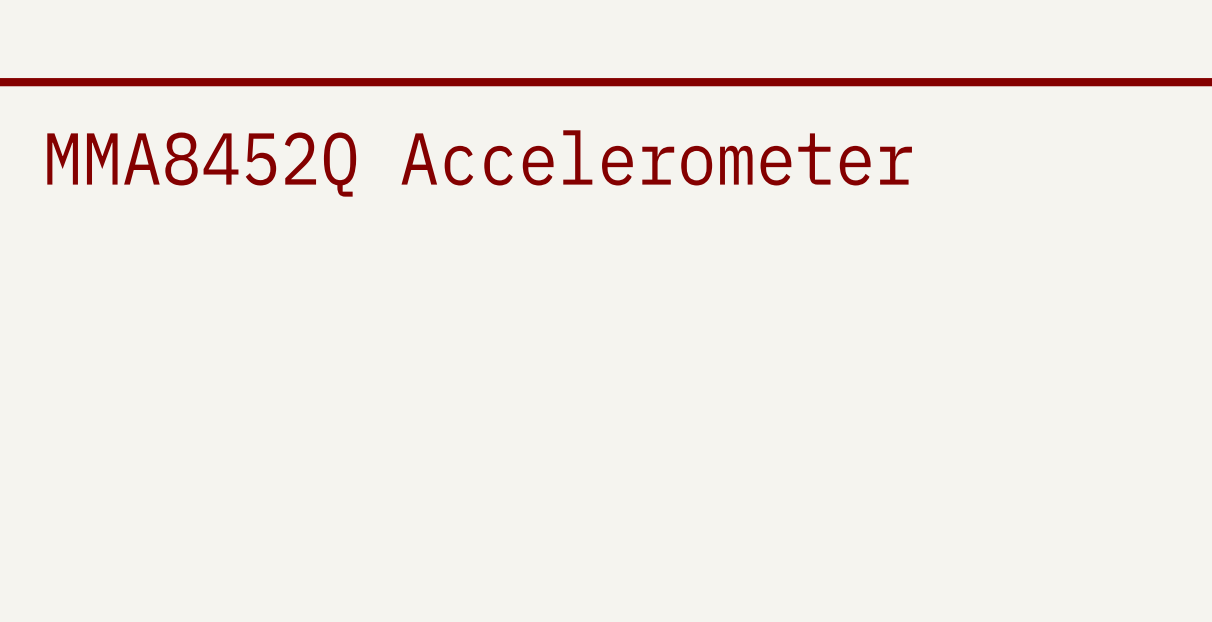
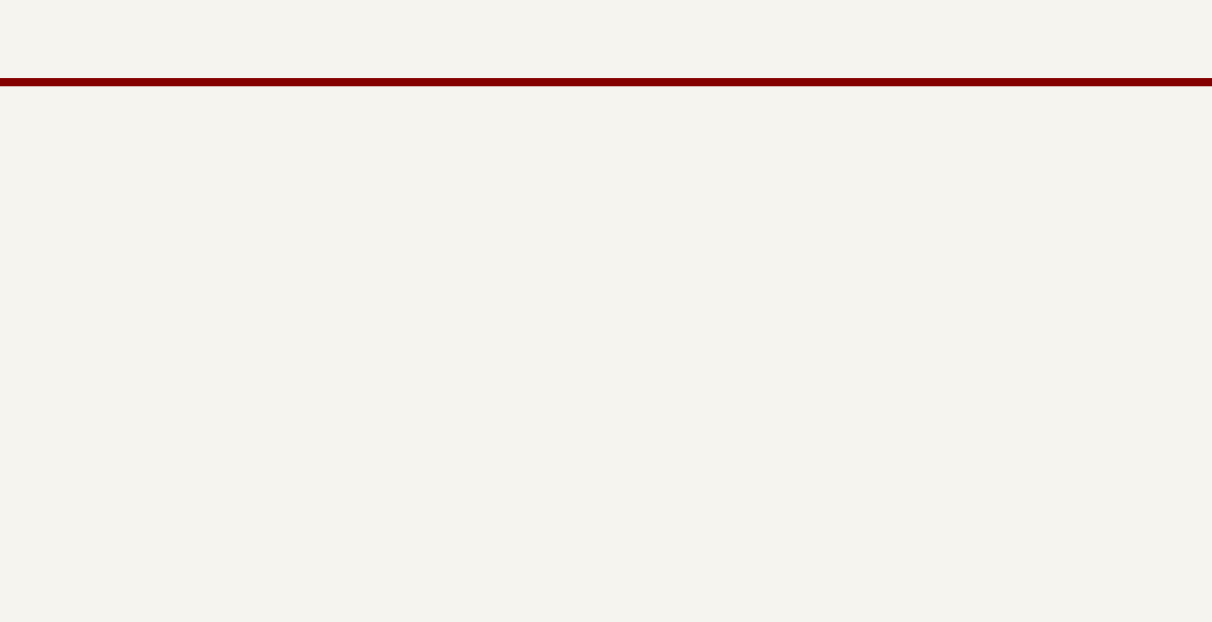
text: MMA8452Q Accelerometer (479, 163) -> none

